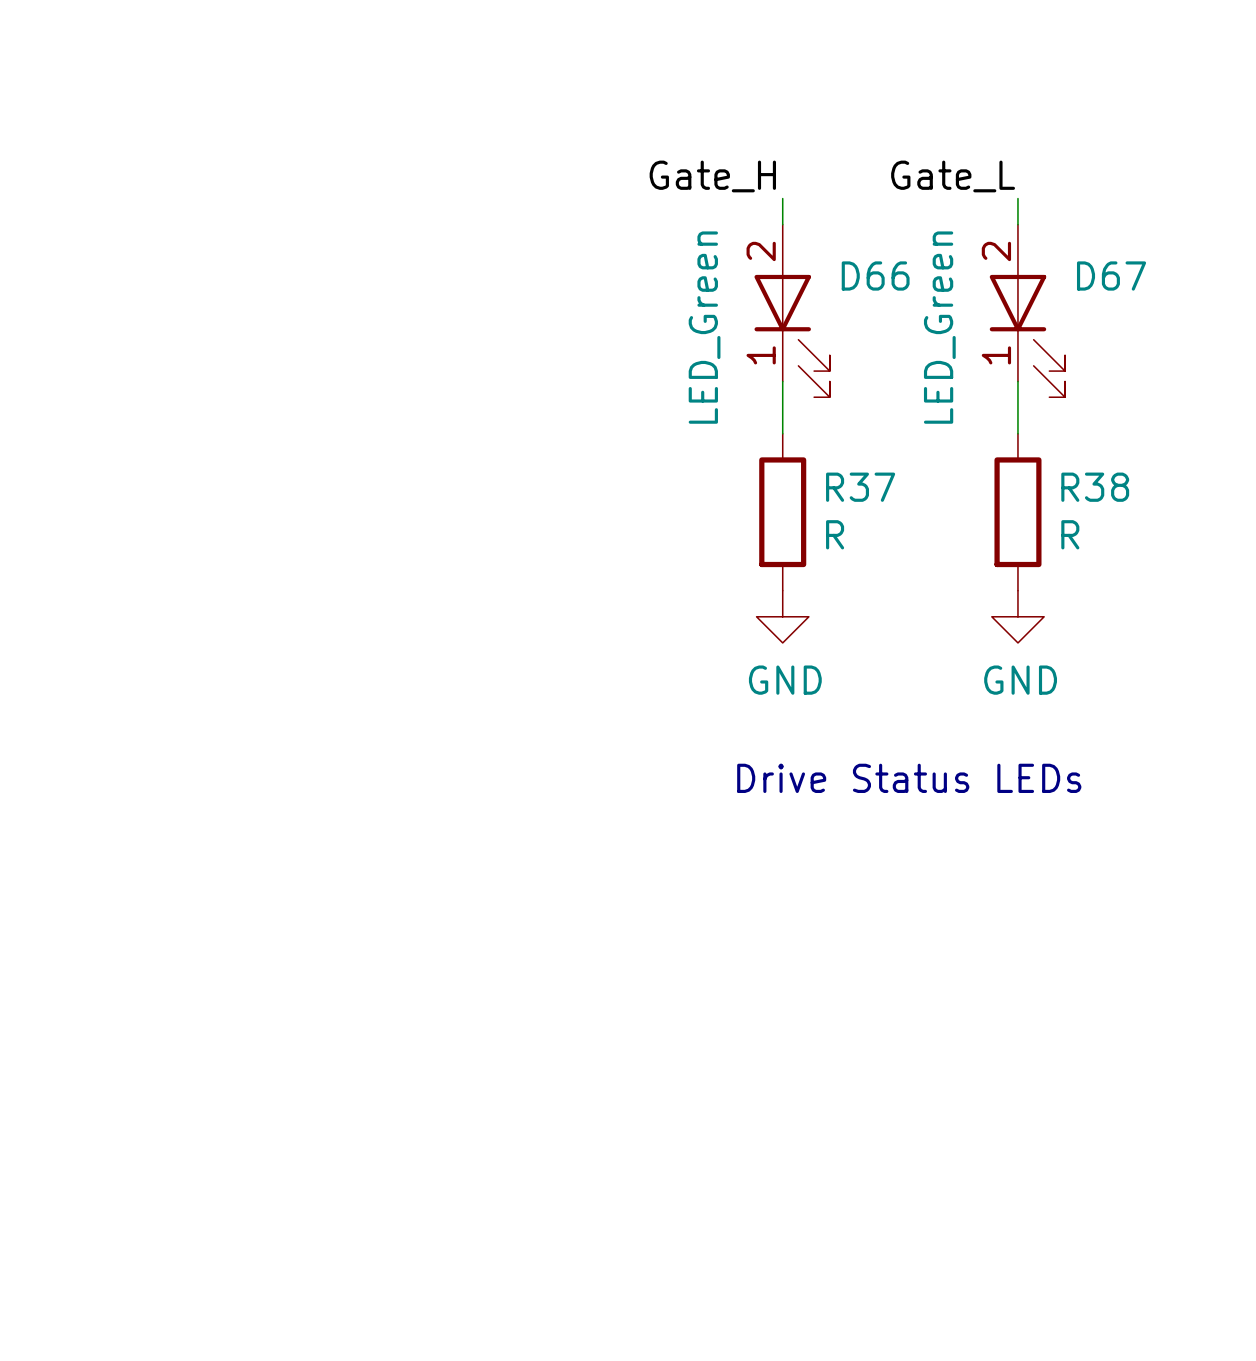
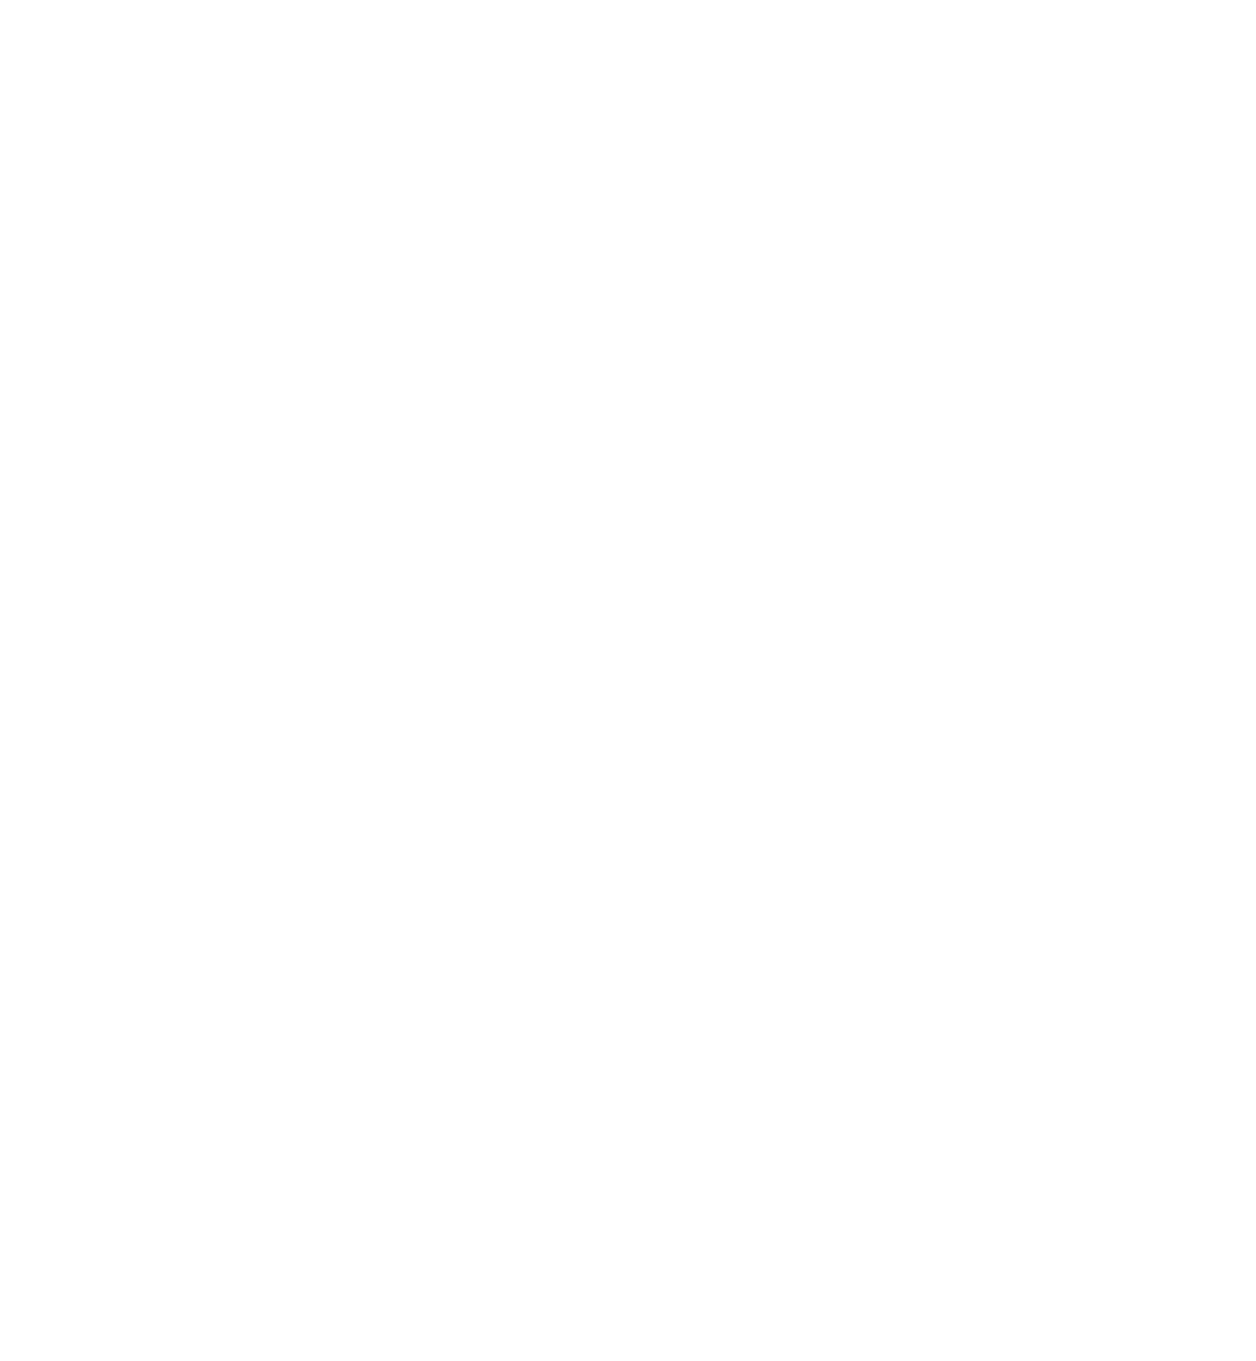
label: Gate_H (712, 176) -> none
label: Gate_L (953, 176) -> none
wire: (782, 198) (782, 224) -> none
wire: (1017, 198) (1017, 224) -> none
D66: LED_Green (792, 310) -> none
D67: LED_Green (1027, 310) -> none
wire: (782, 381) (782, 433) -> none
wire: (1017, 381) (1017, 433) -> none
R37: R (782, 512) -> none
R38: R (1017, 512) -> none
power symbol: GND (782, 616) -> none
power symbol: GND (1017, 616) -> none
text: Drive Status LEDs (909, 778) -> none

